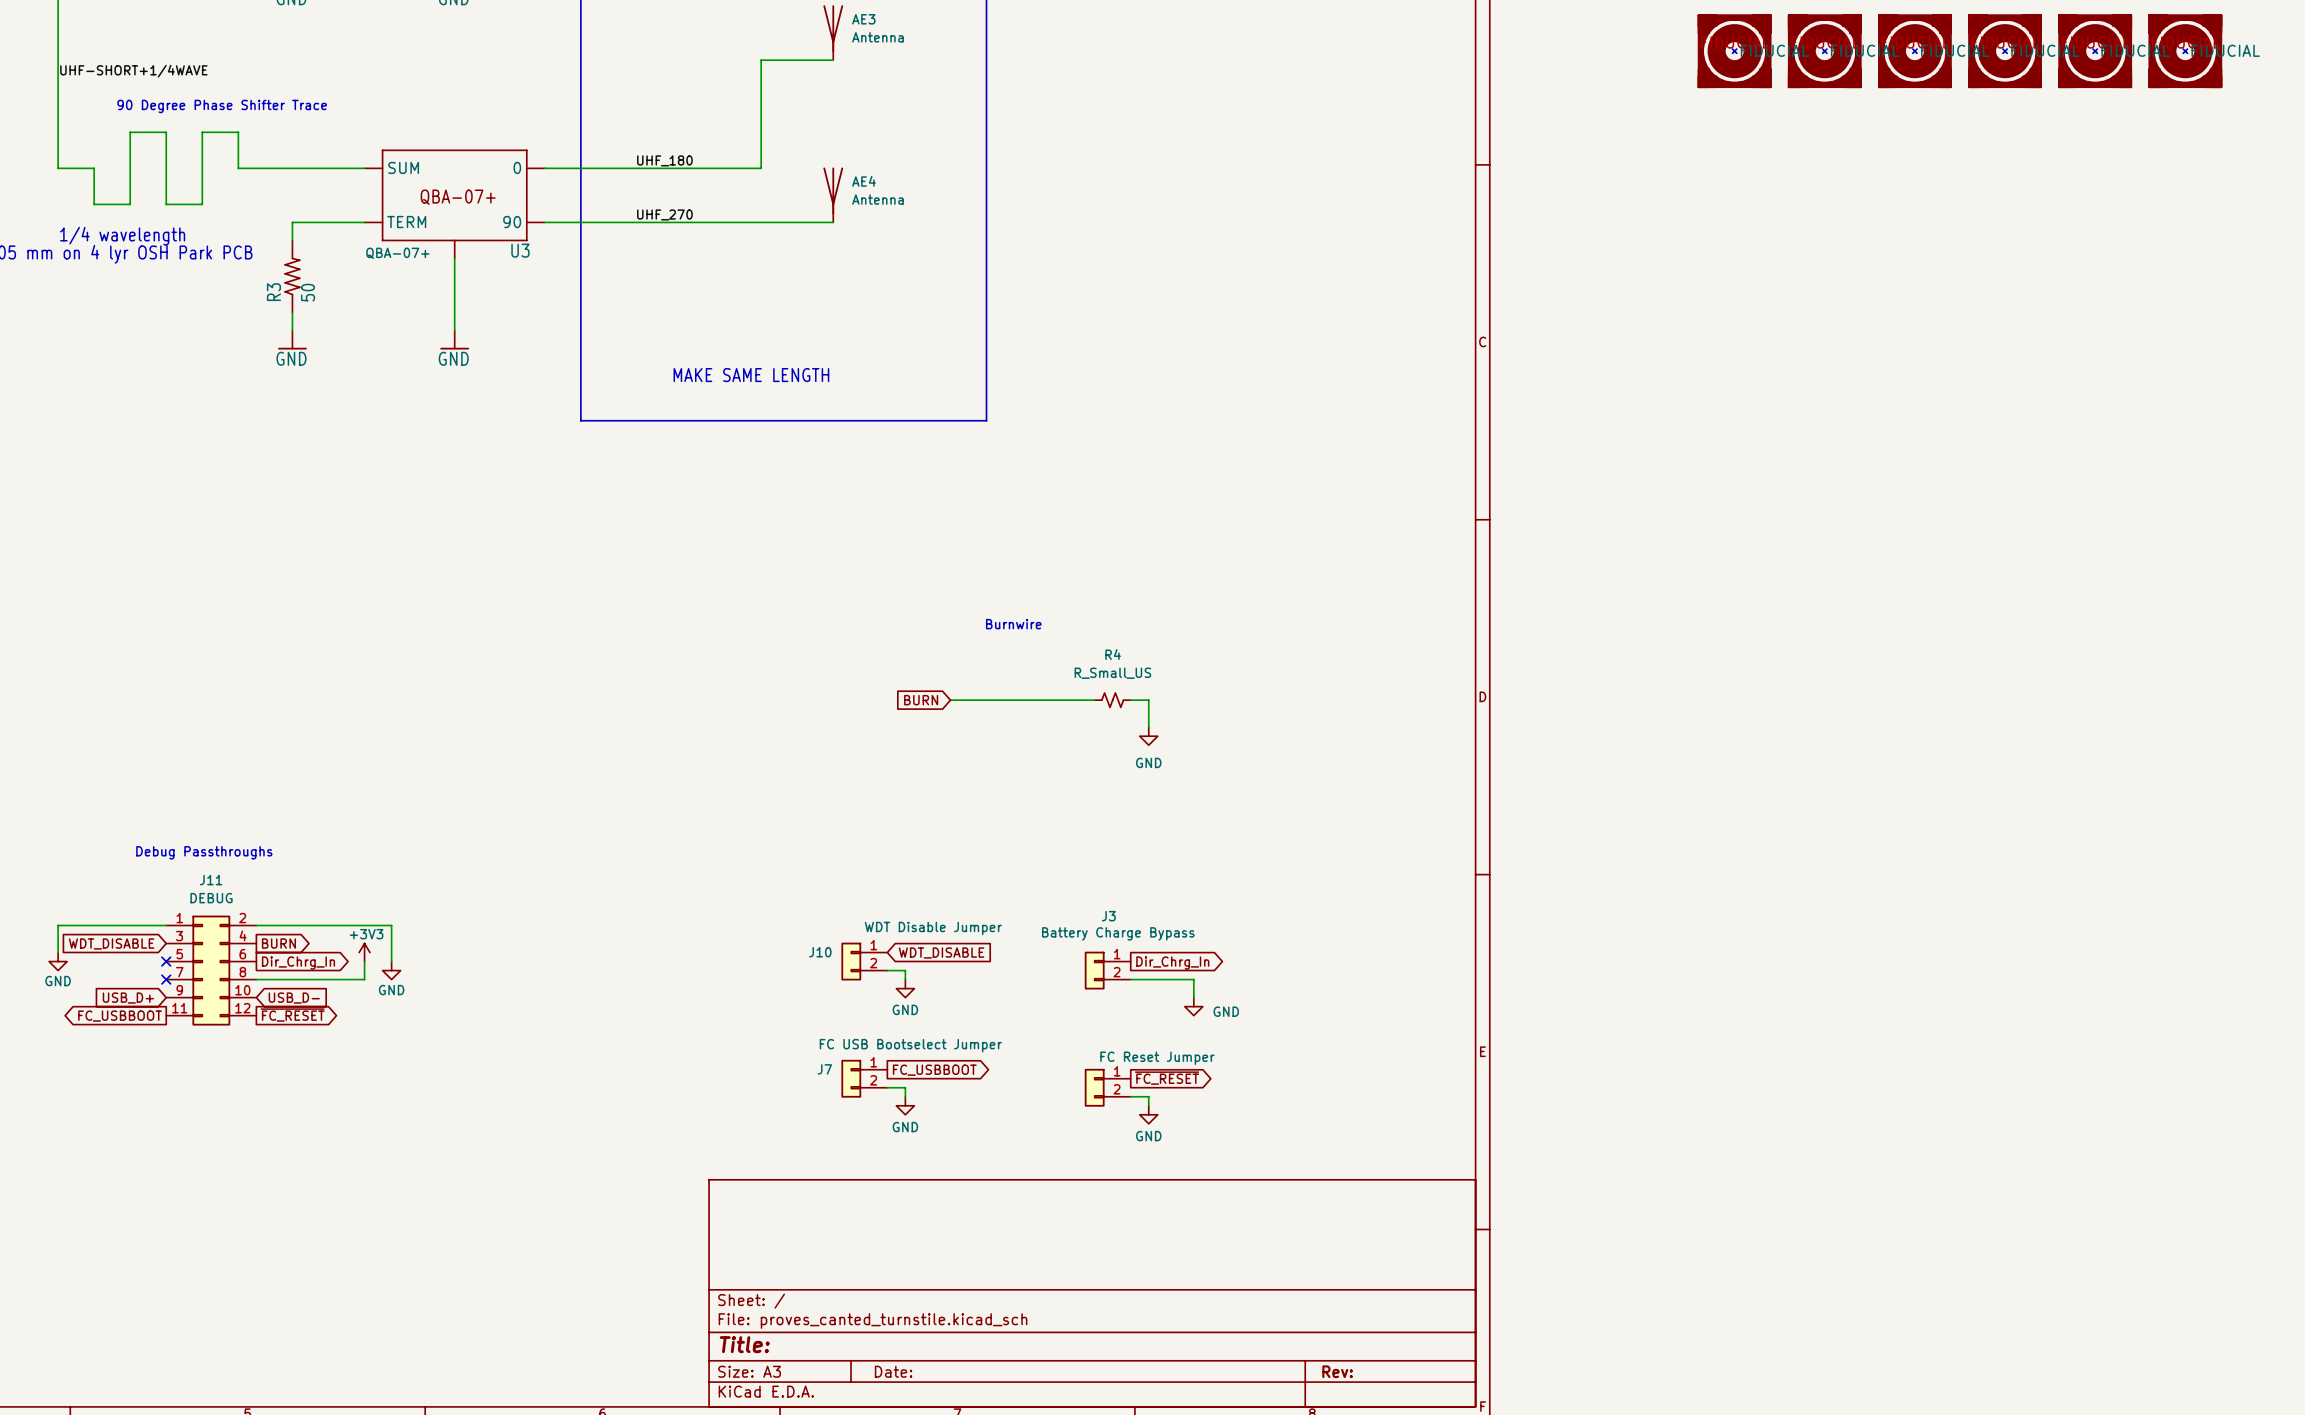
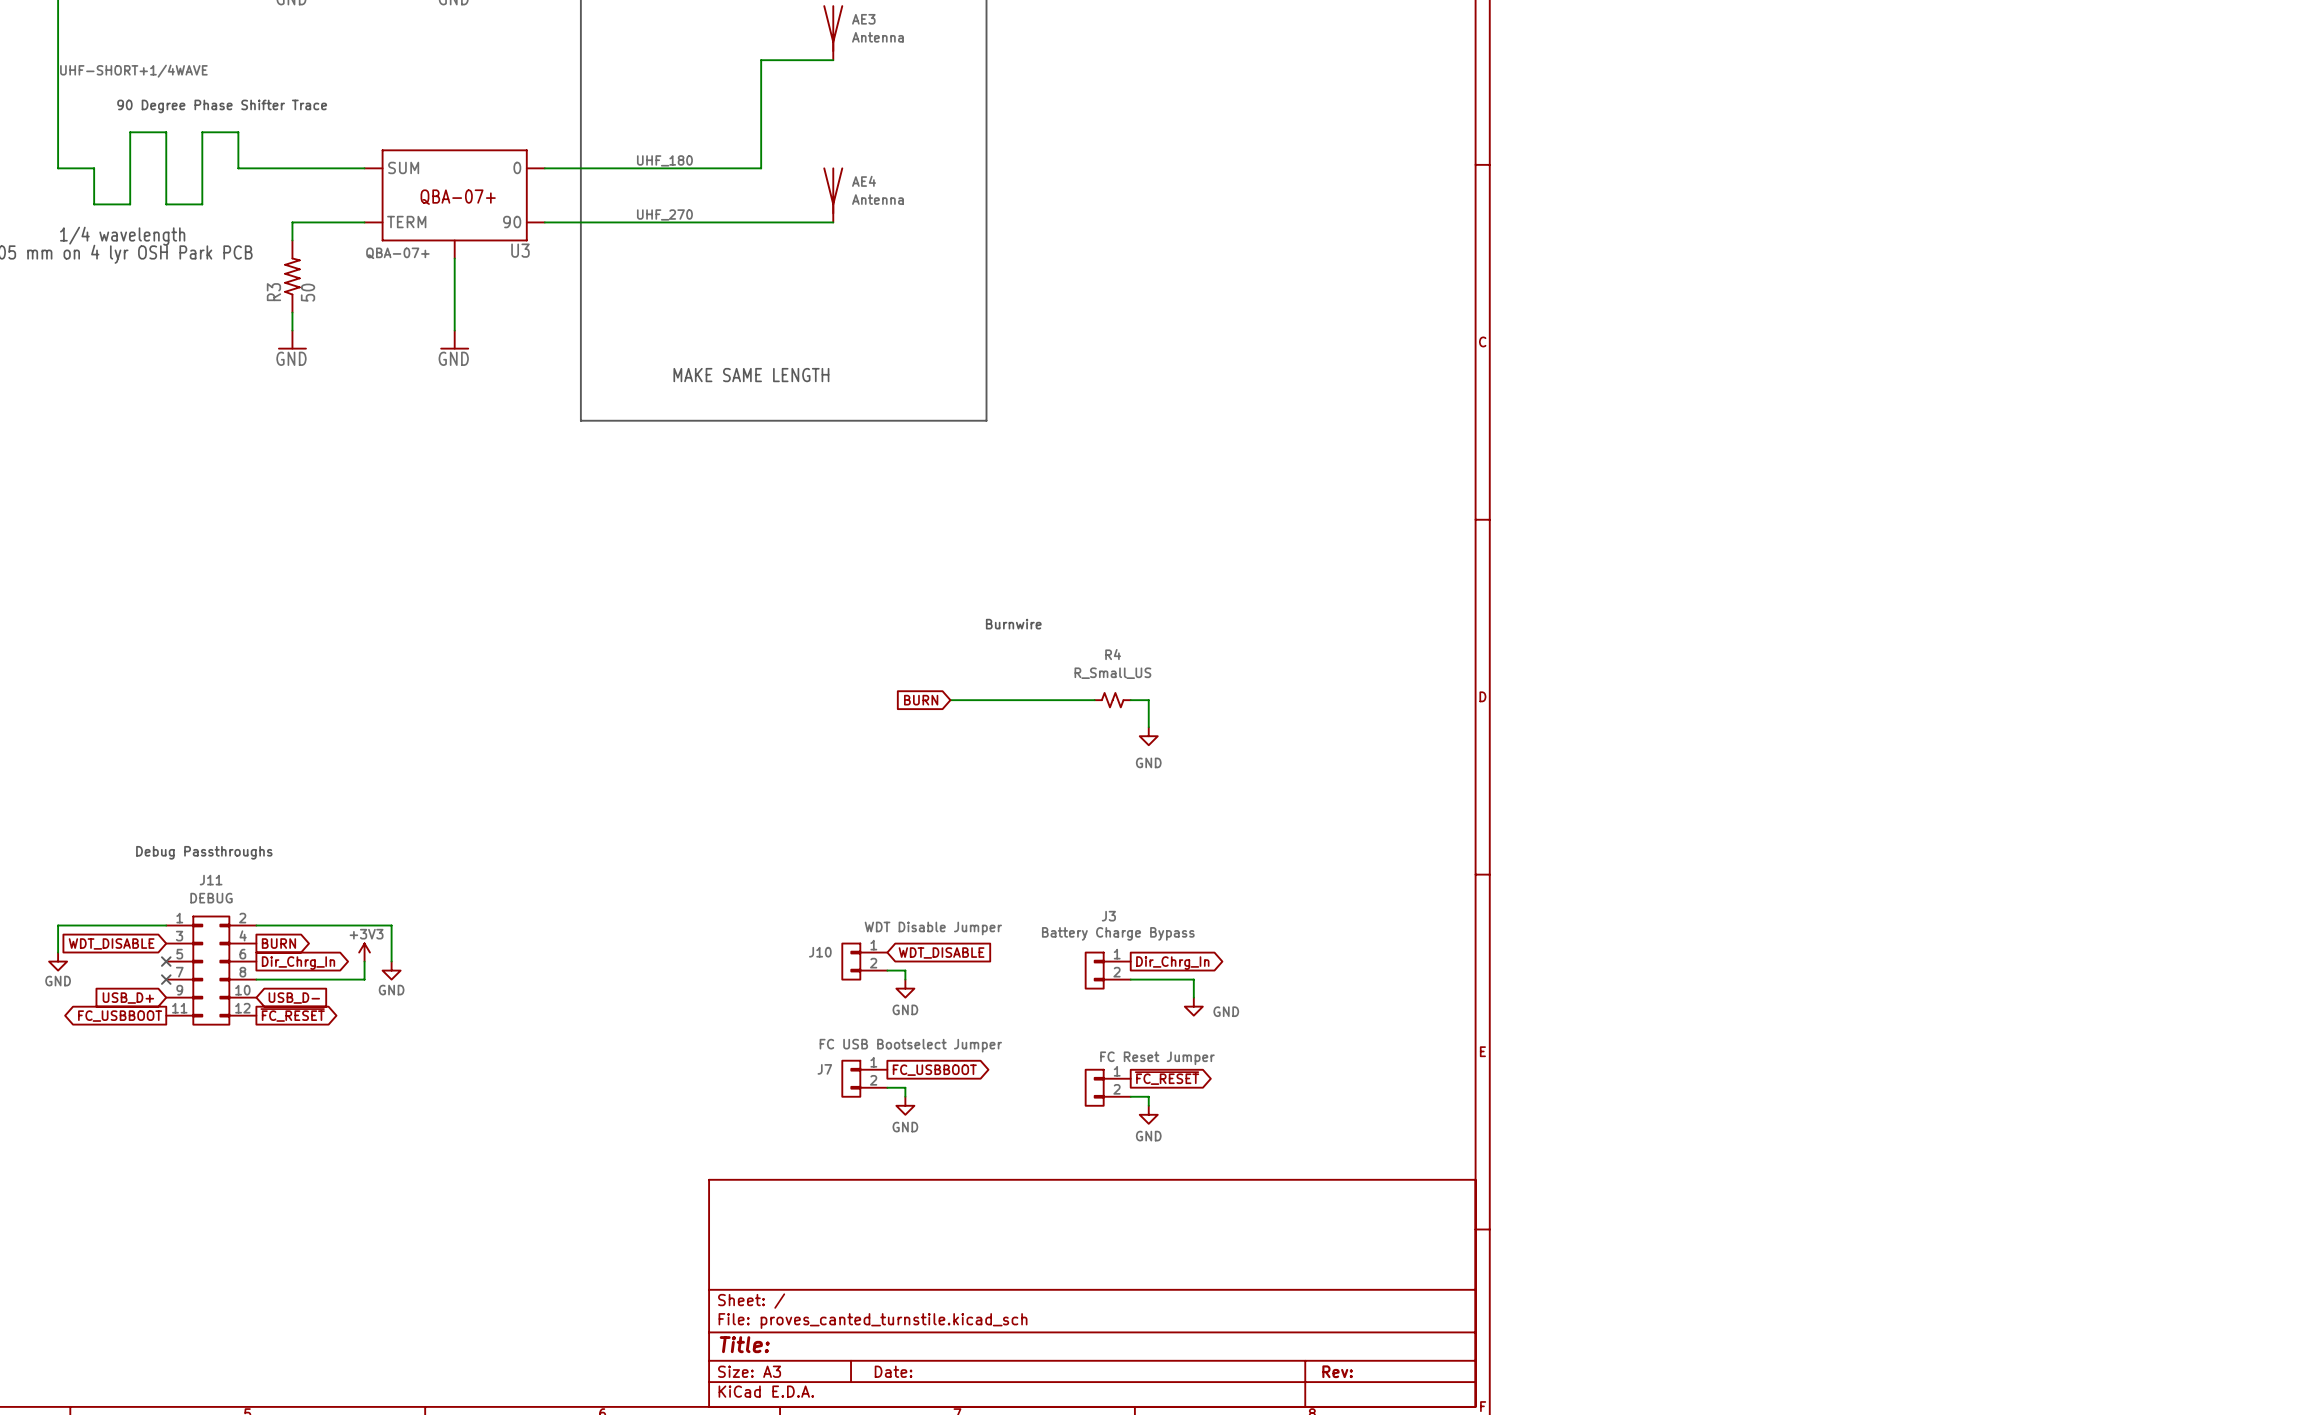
part: (1734, 51) -> none
part: (1824, 51) -> none
part: (1914, 51) -> none
part: (2005, 51) -> none
part: (2095, 51) -> none
part: (2185, 51) -> none

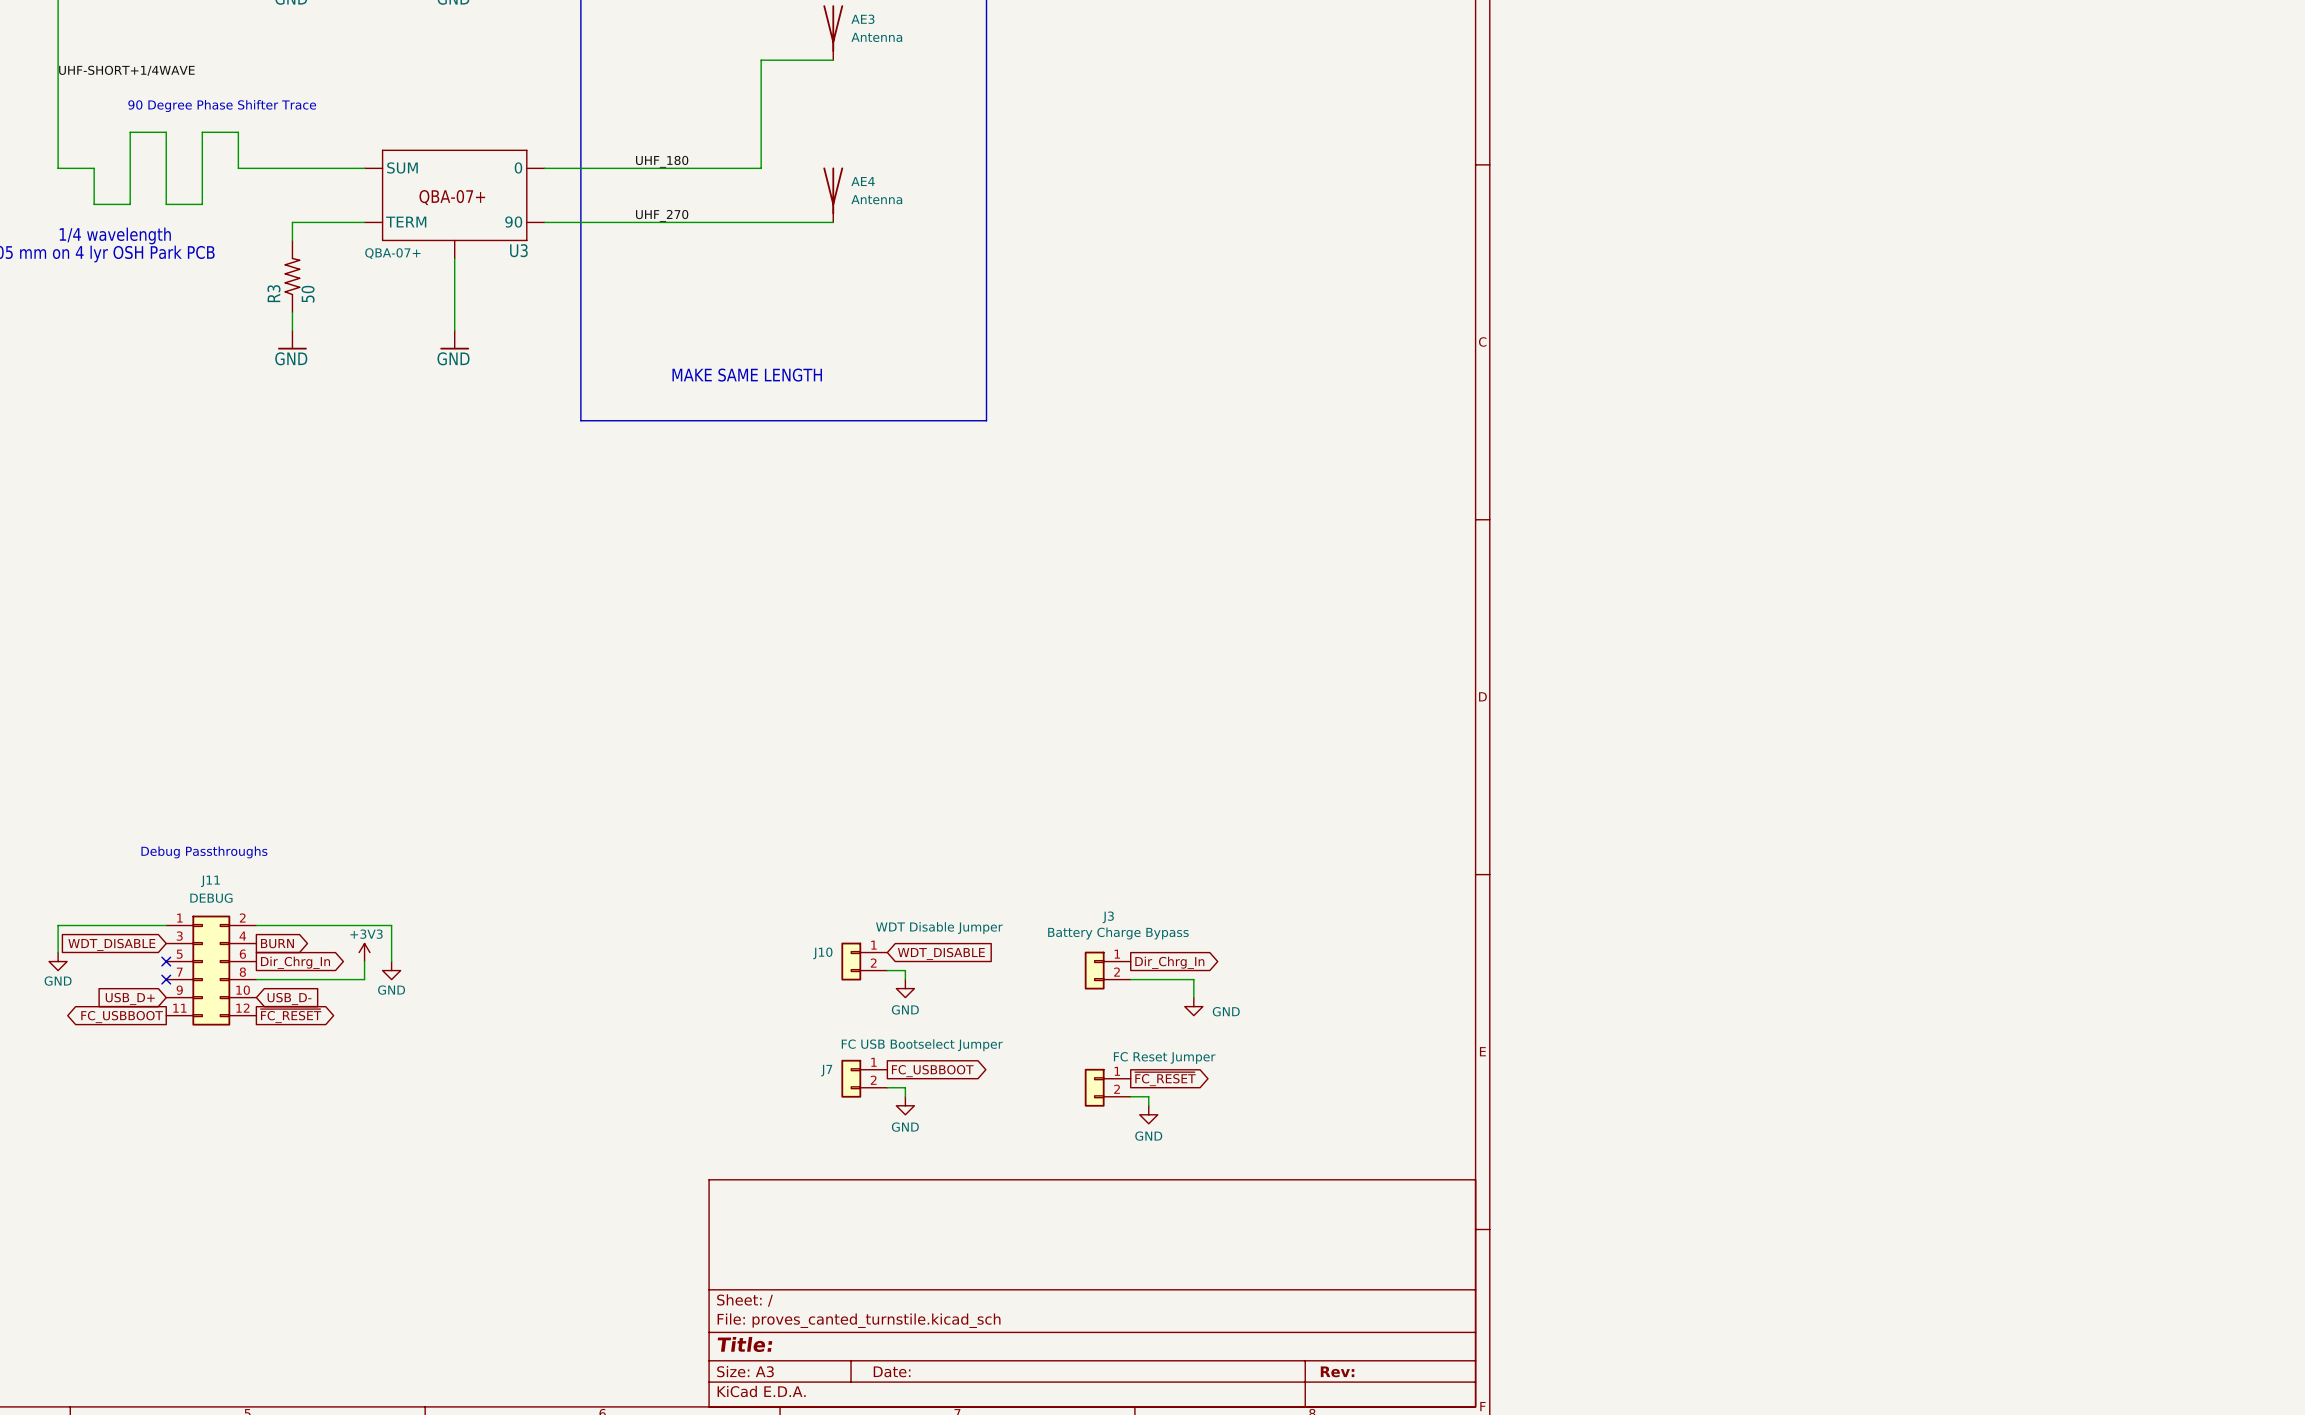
text: Burnwire (1013, 624) -> none
global label: BURN (921, 700) -> none
wire: (950, 700) (1094, 700) -> none
R4: R_Small_US (1112, 700) -> none
wire: (1130, 700) (1148, 700) (1148, 727) -> none
power symbol: GND (1148, 736) -> none

